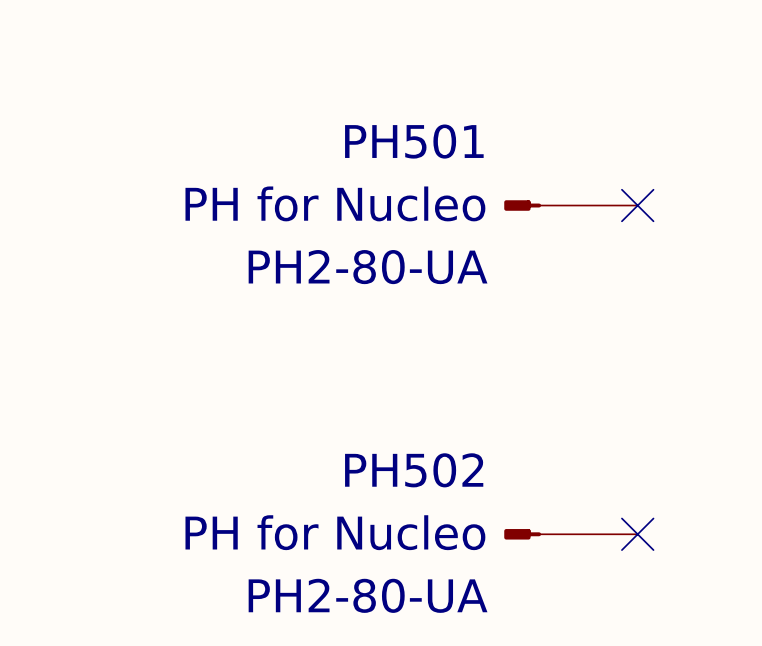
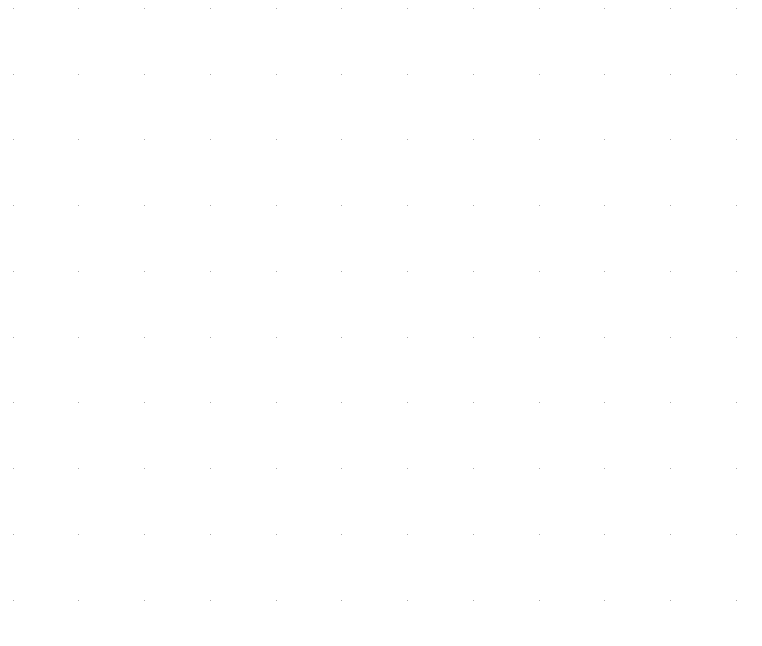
PH501: PH for Nucleo (570, 205) -> none
no-connect mark: (637, 205) -> none
PH502: PH for Nucleo (570, 534) -> none
no-connect mark: (637, 534) -> none

